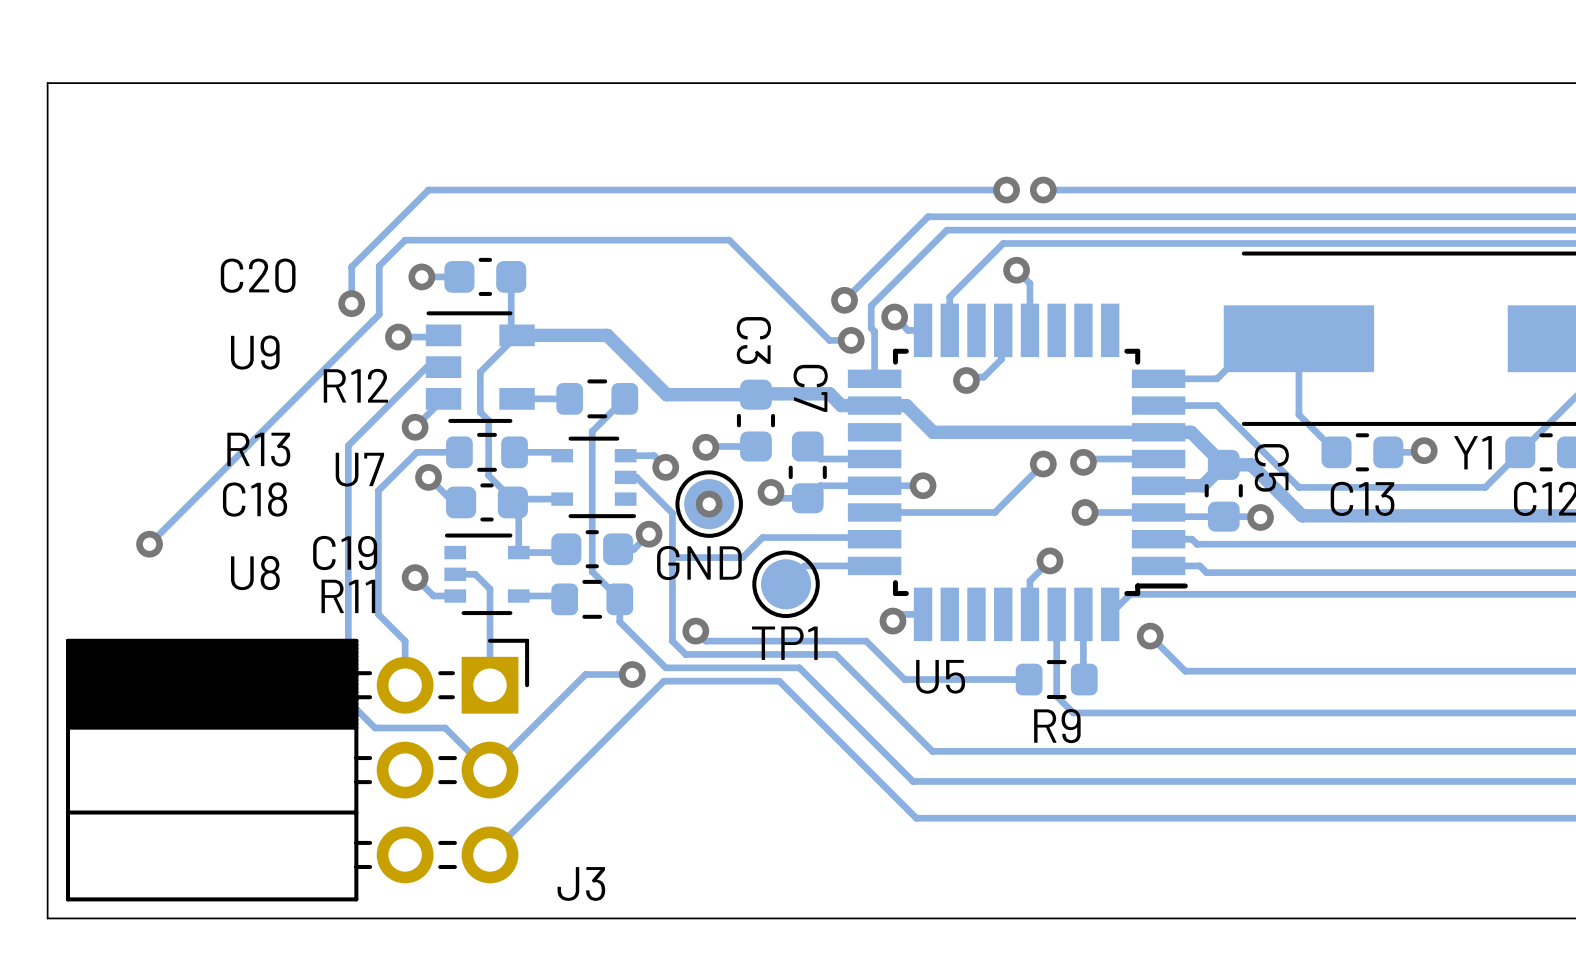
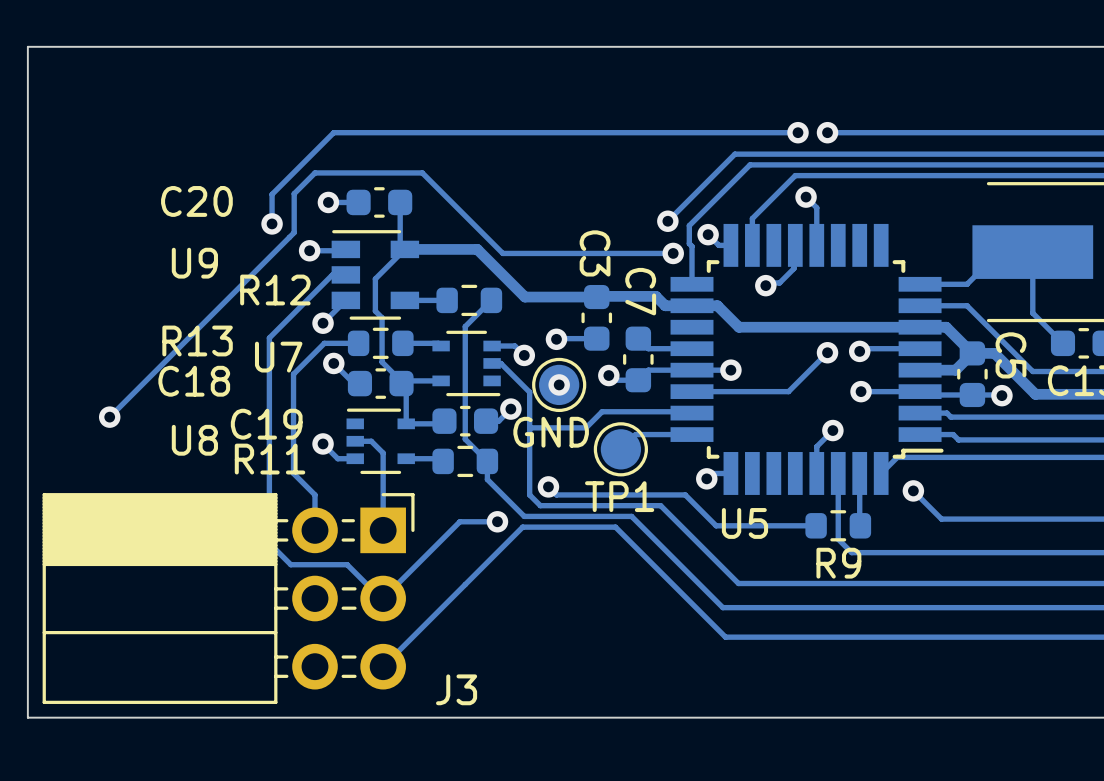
track: (538, 240) (729, 240) (829, 340) -> (422, 172) (502, 253) (655, 253)

